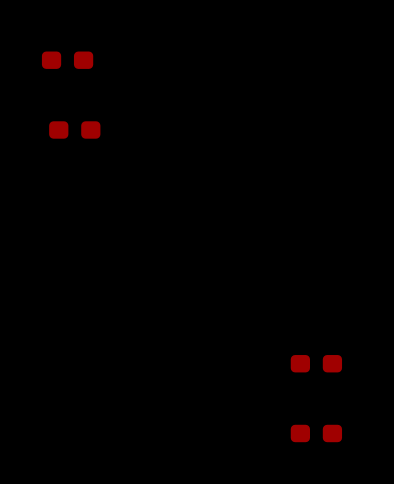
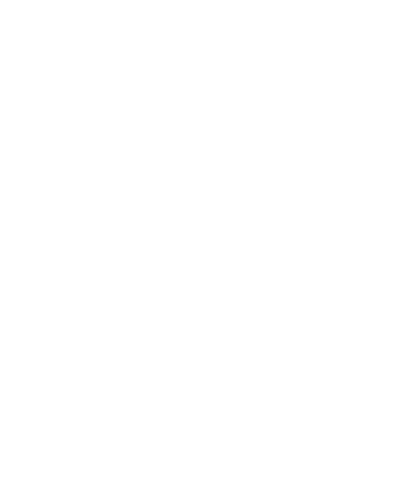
part: (67, 60) -> none
part: (74, 129) -> none
part: (316, 363) -> none
part: (316, 433) -> none

